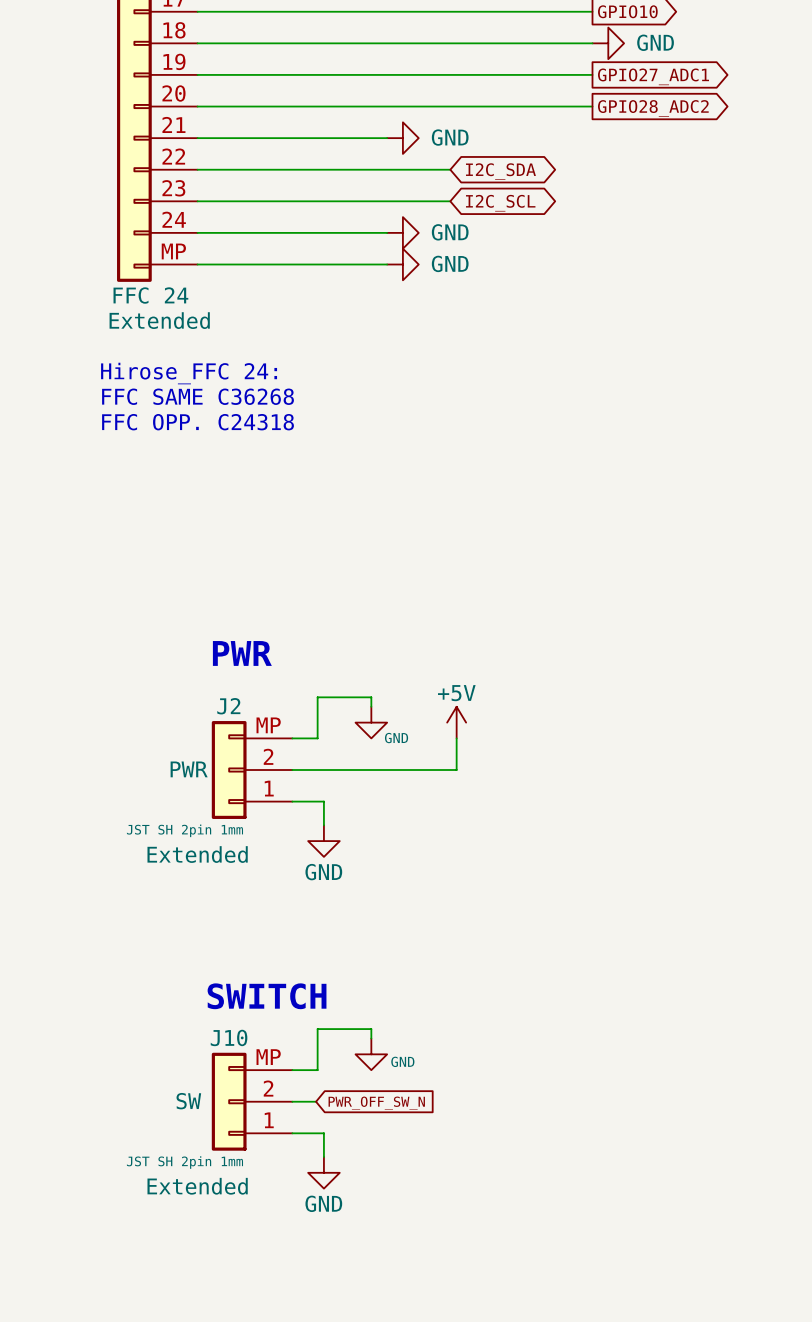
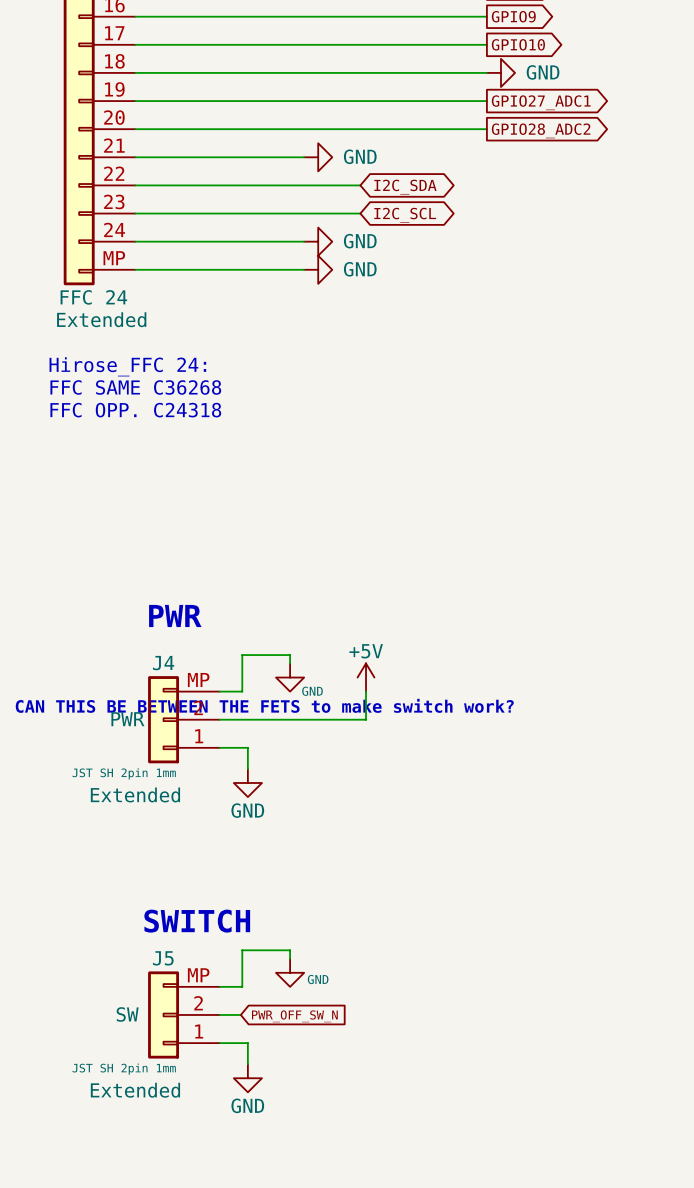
J2 name: J2 (228, 706) -> J4 (163, 663)
text: none -> CAN THIS BE BETWEEN THE FETS to make switch work? (264, 705)
J10 name: J10 (229, 1037) -> J5 (163, 958)

